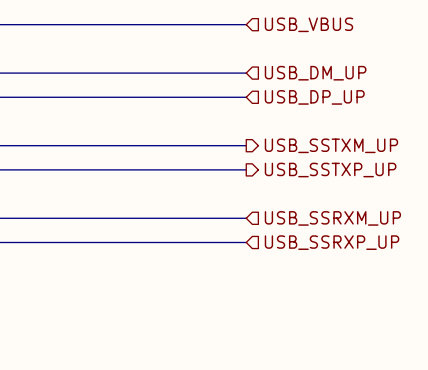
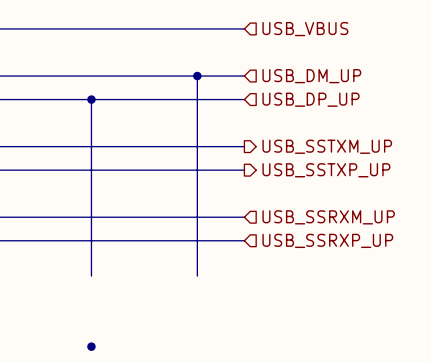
wire: none -> (197, 76) (197, 276)
junction: none -> (197, 76)
wire: none -> (91, 99) (91, 276)
junction: none -> (91, 99)
junction: none -> (91, 346)

